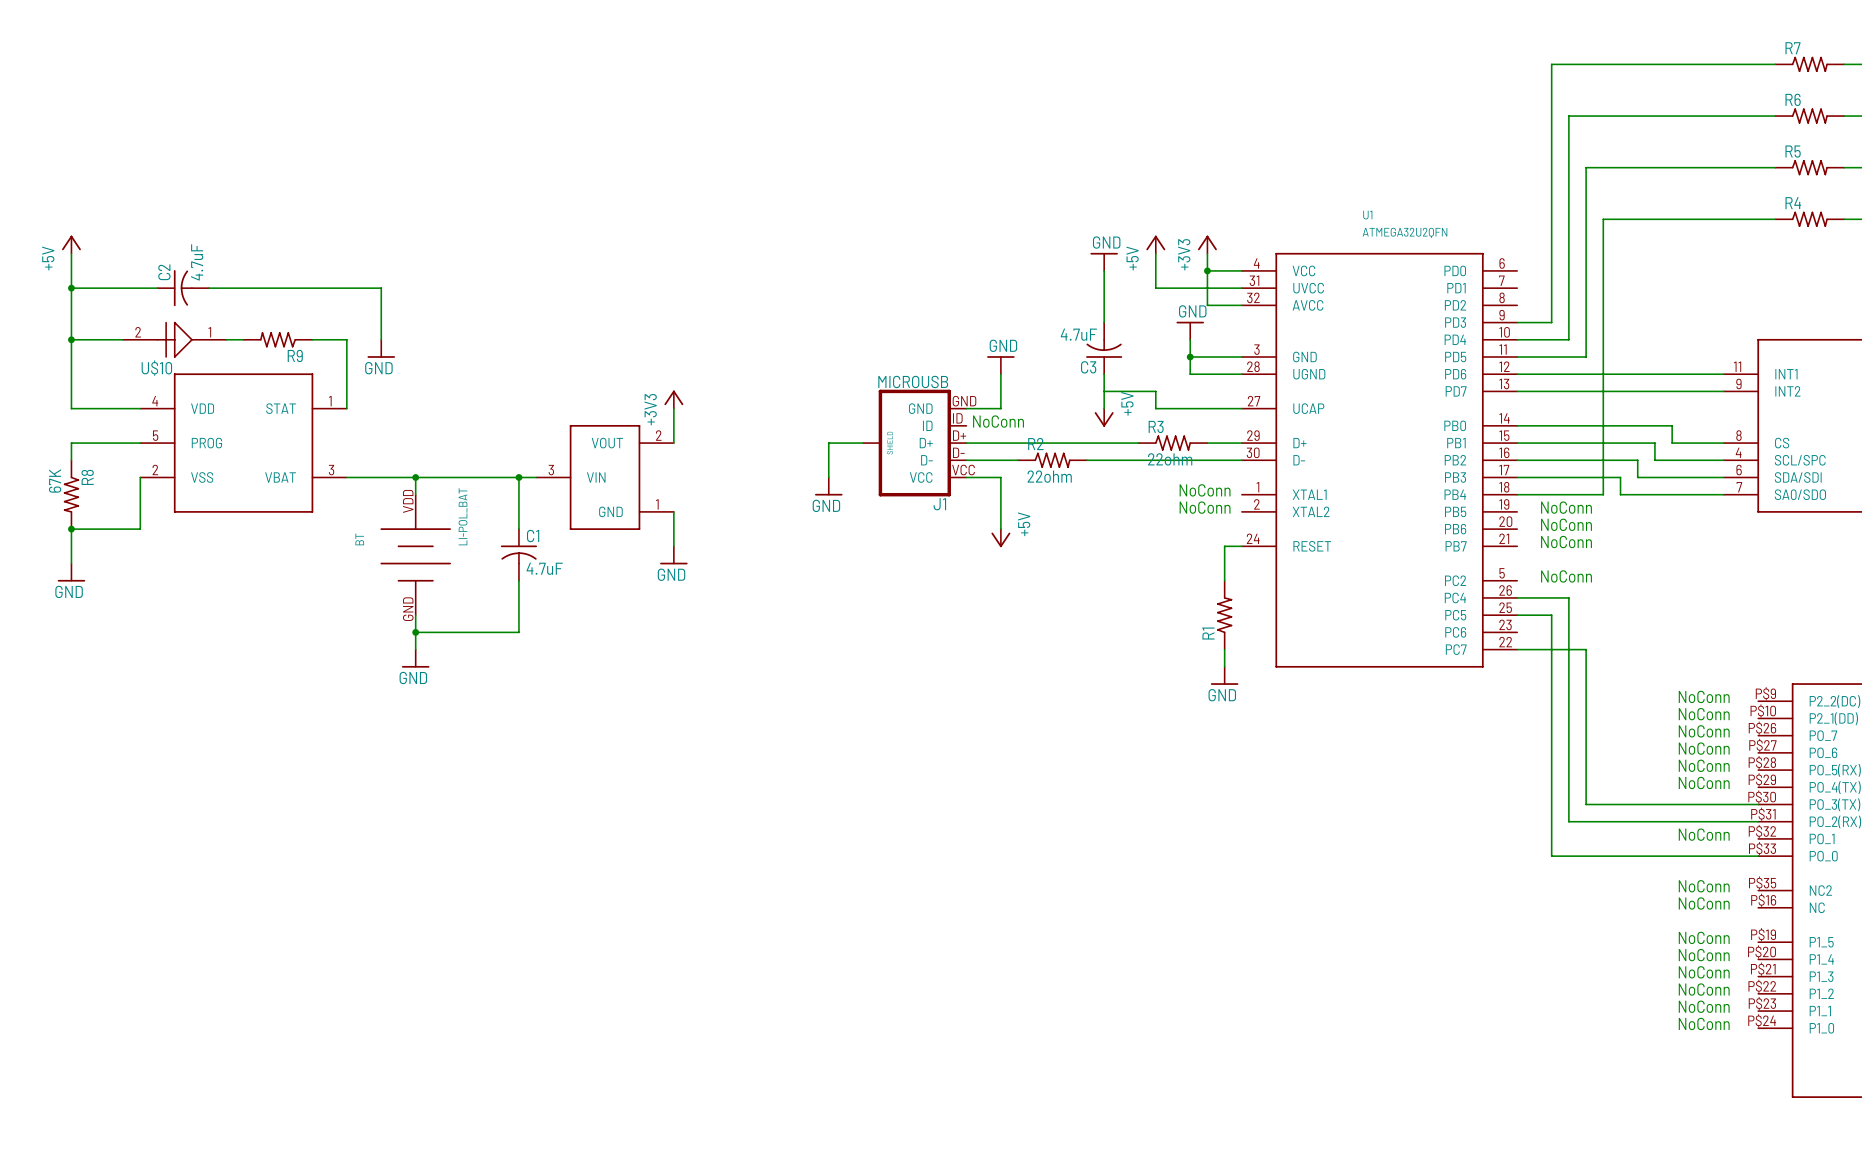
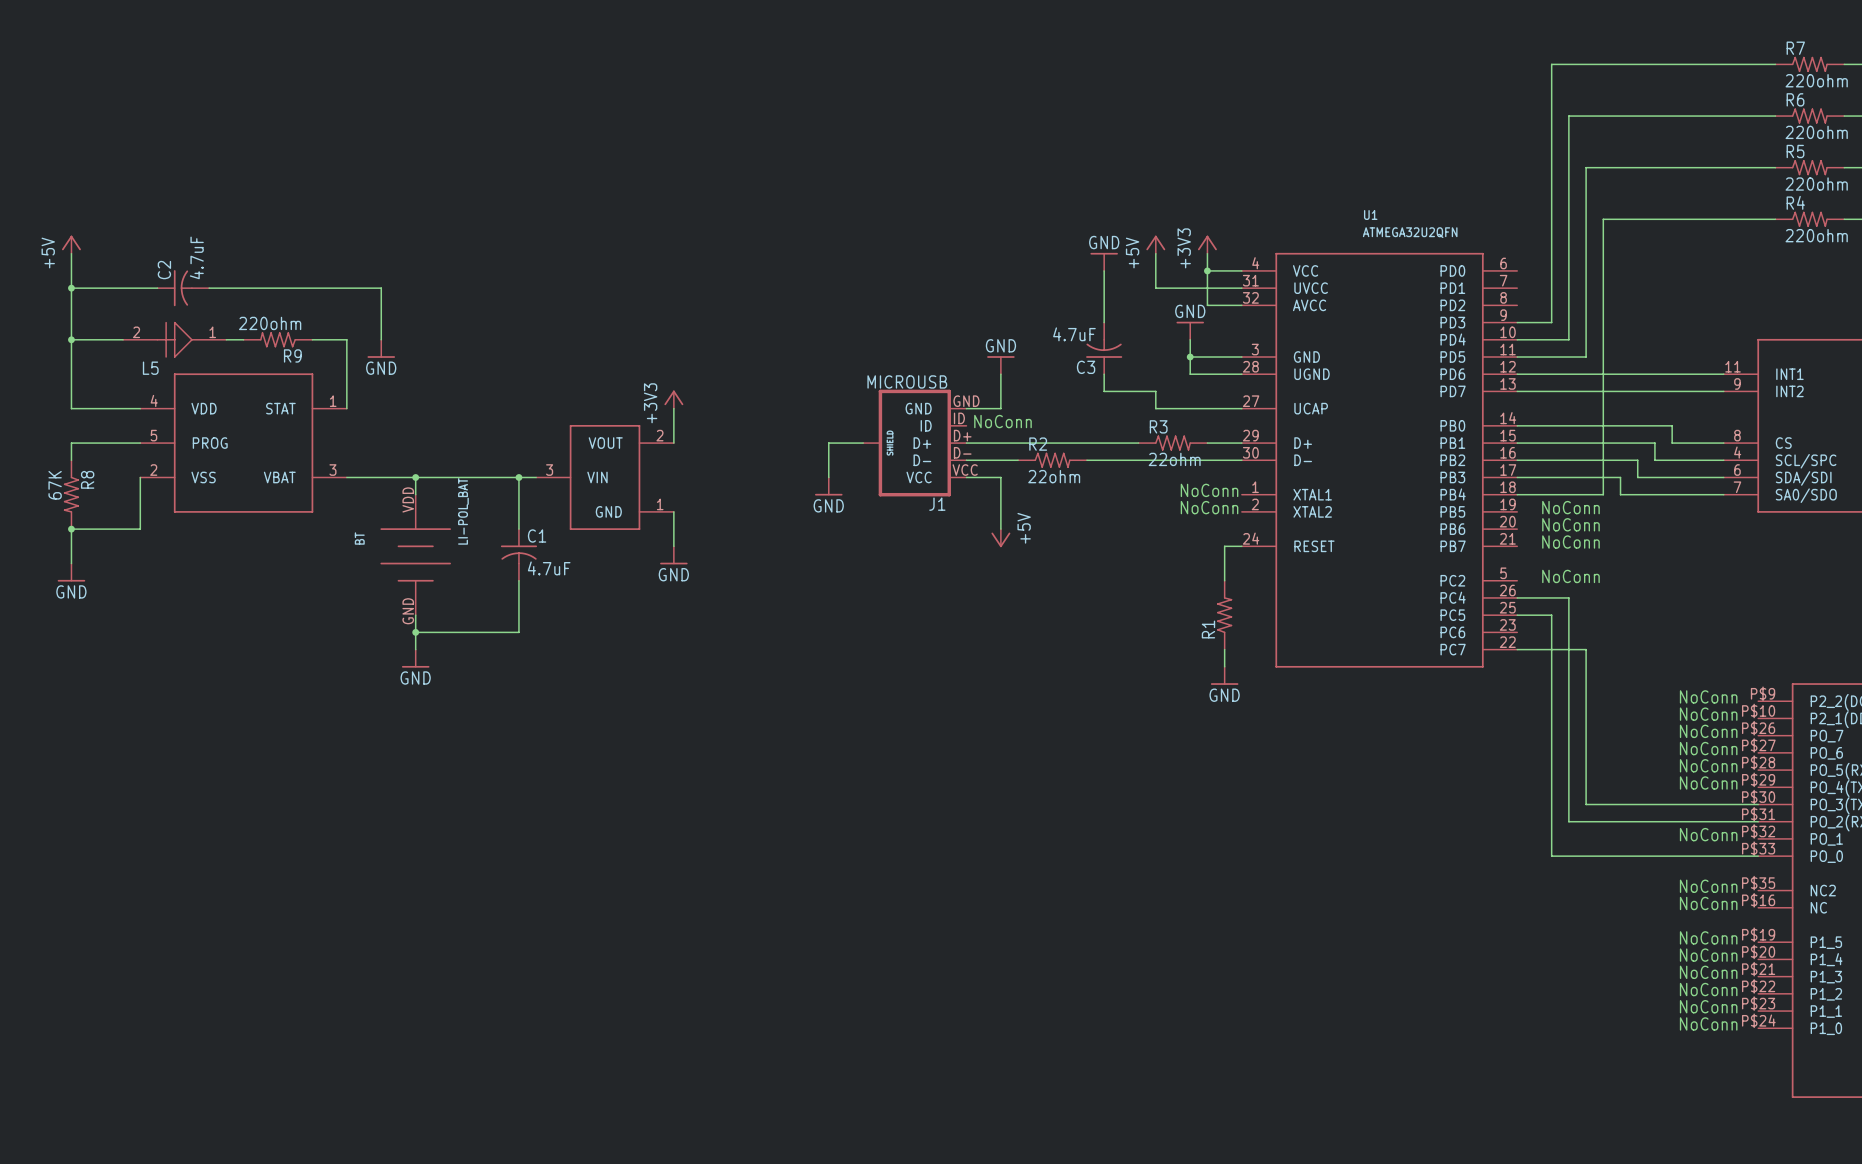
R7 value: none -> 220ohm (1816, 80)
R6 value: none -> 220ohm (1816, 132)
R5 value: none -> 220ohm (1816, 184)
R4 value: none -> 220ohm (1816, 235)
R9 value: none -> 220ohm (270, 323)
U$10 name: U$10 (156, 368) -> L5 (150, 368)
wire: (1104, 391) (1104, 408) -> none
power symbol: +5V (1104, 417) -> none

